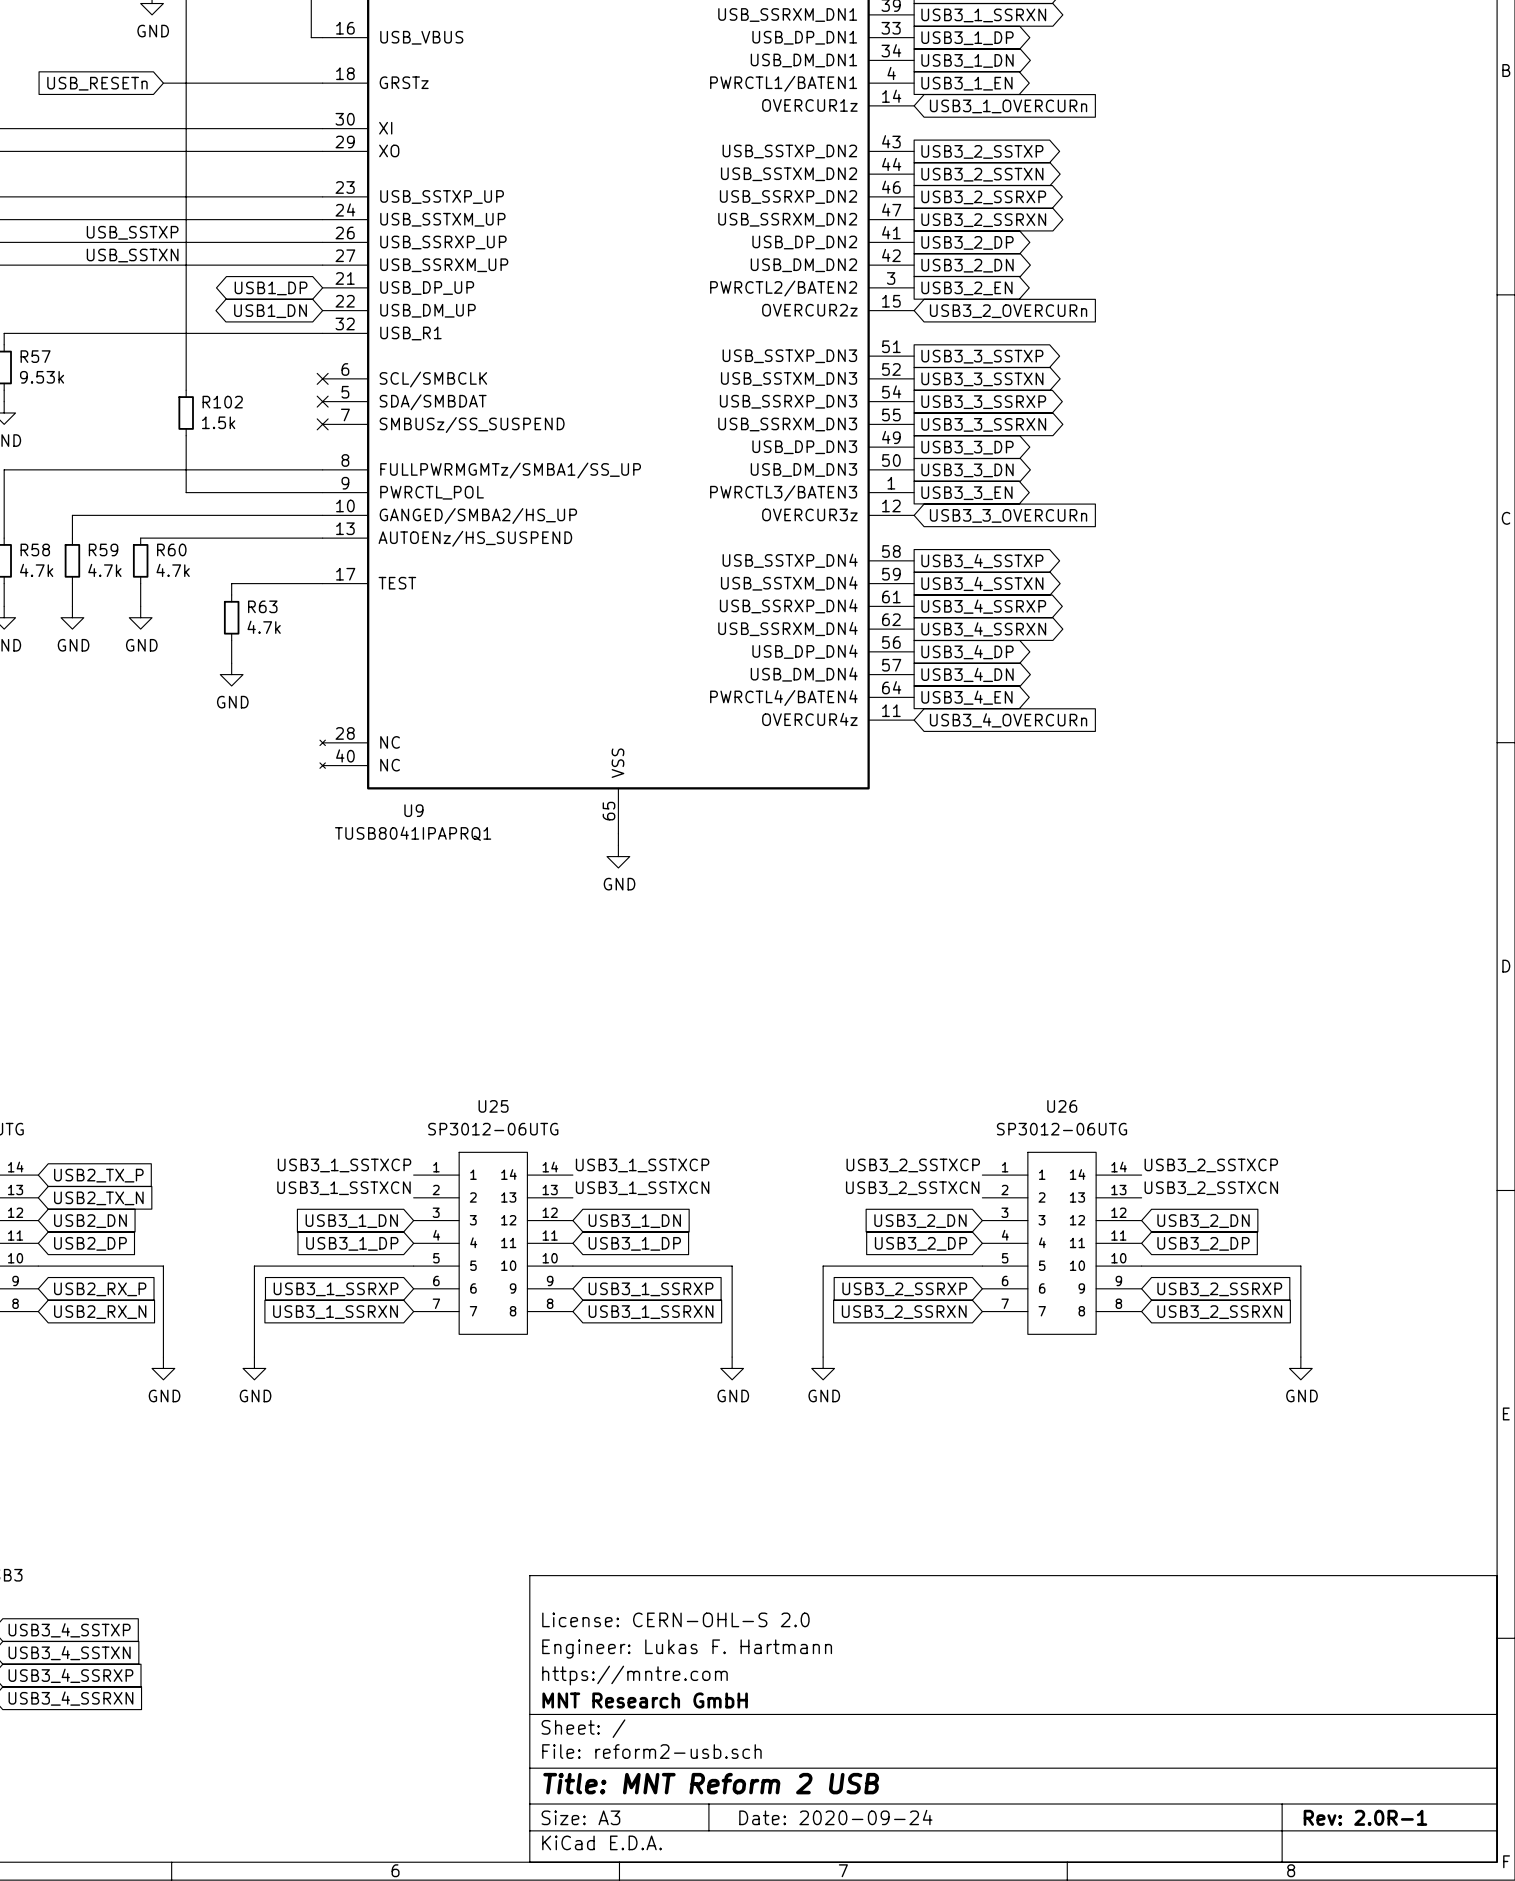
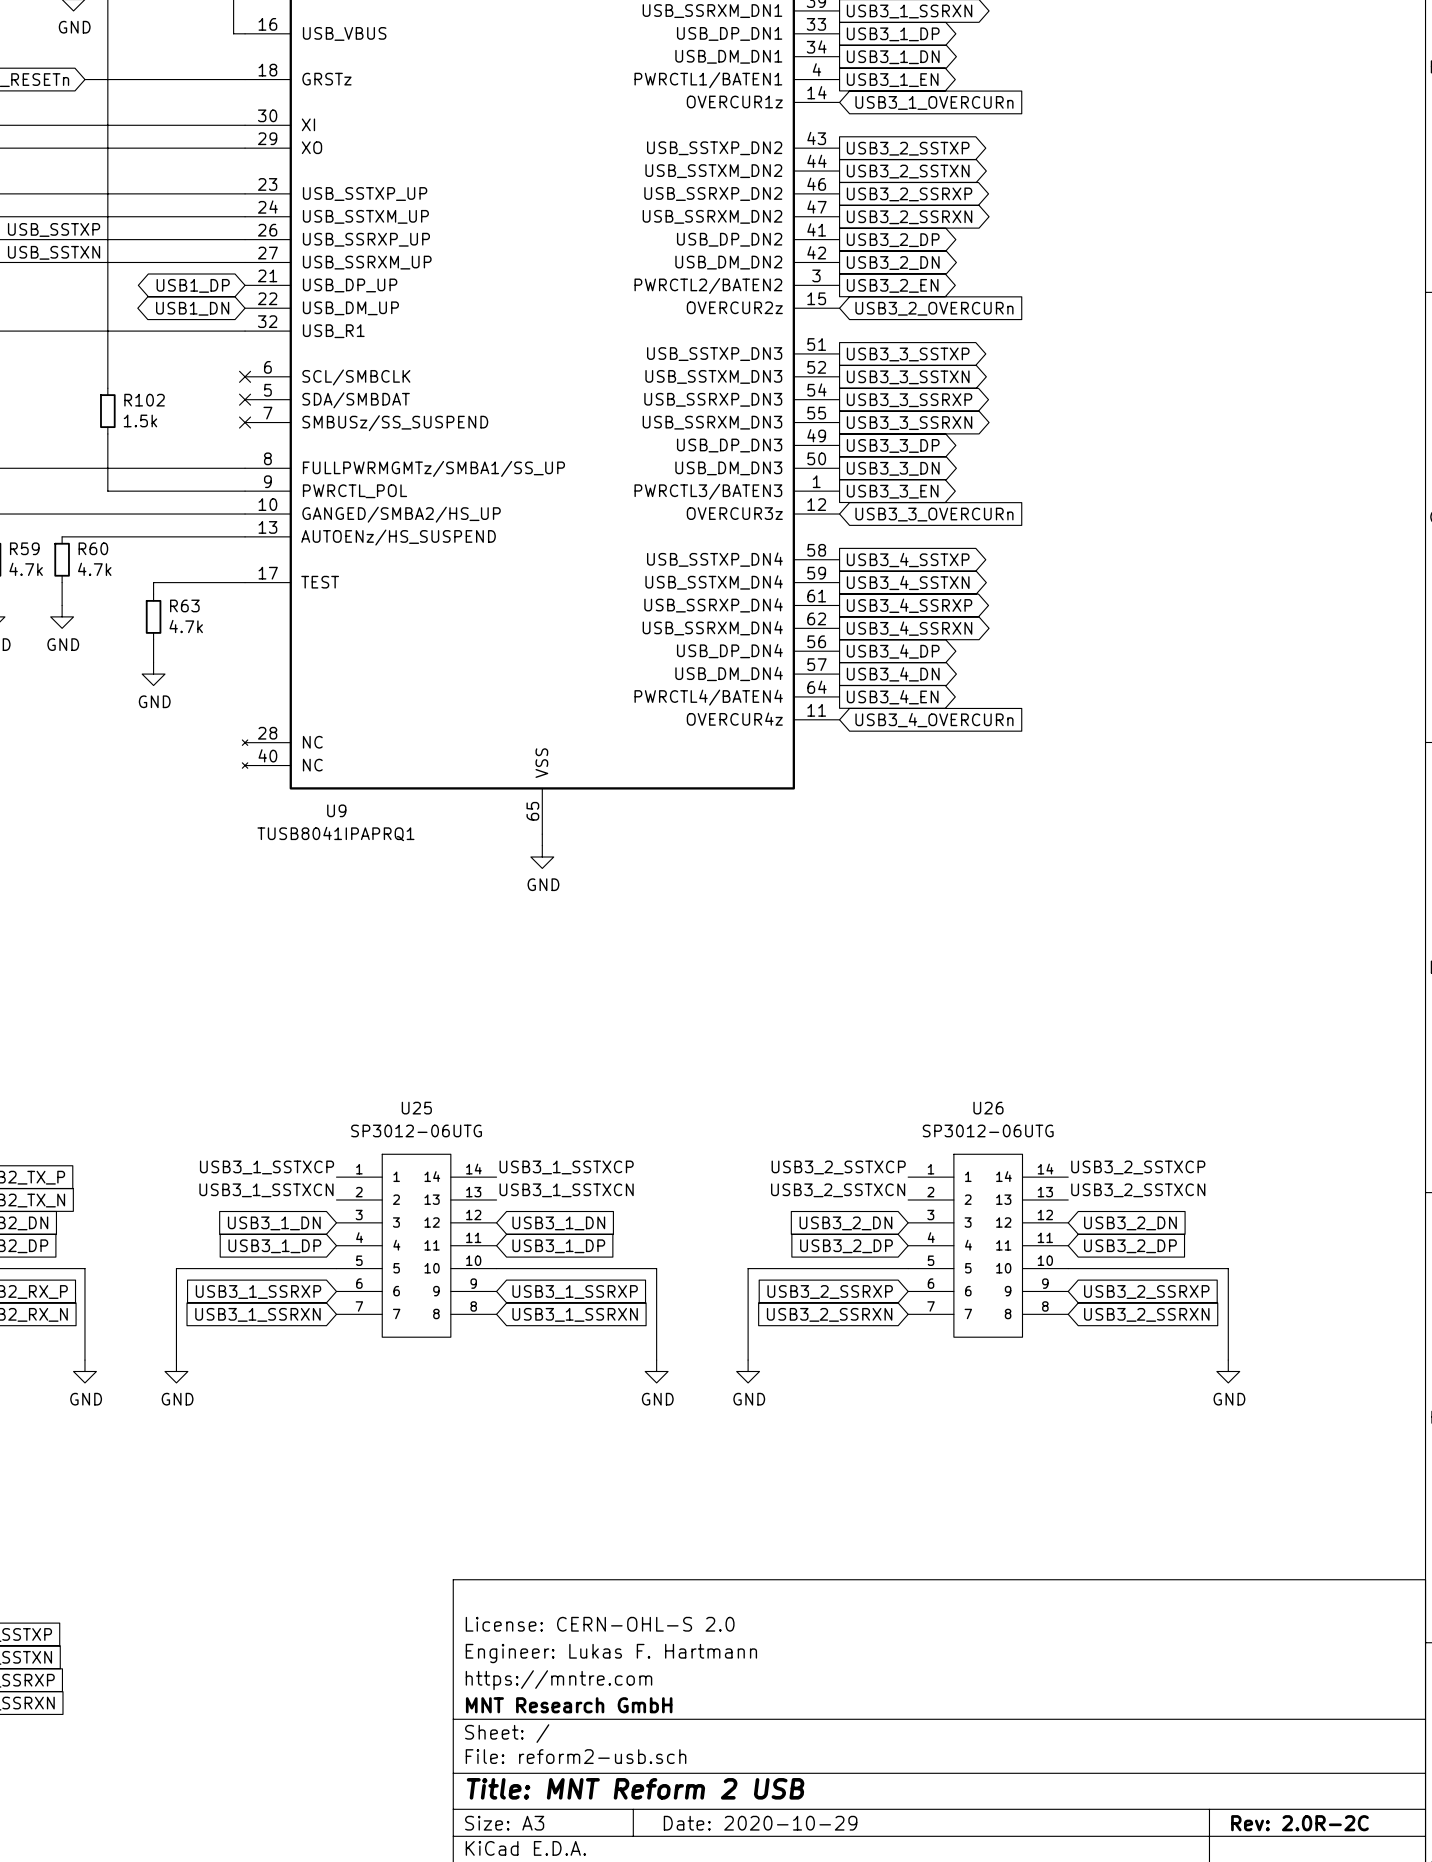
title block: Date: 2020-09-24 (835, 1817) -> Date: 2020-10-29 (760, 1823)
title block: Rev: 2.0R-1 (1365, 1817) -> Rev: 2.0R-2C (1299, 1823)

